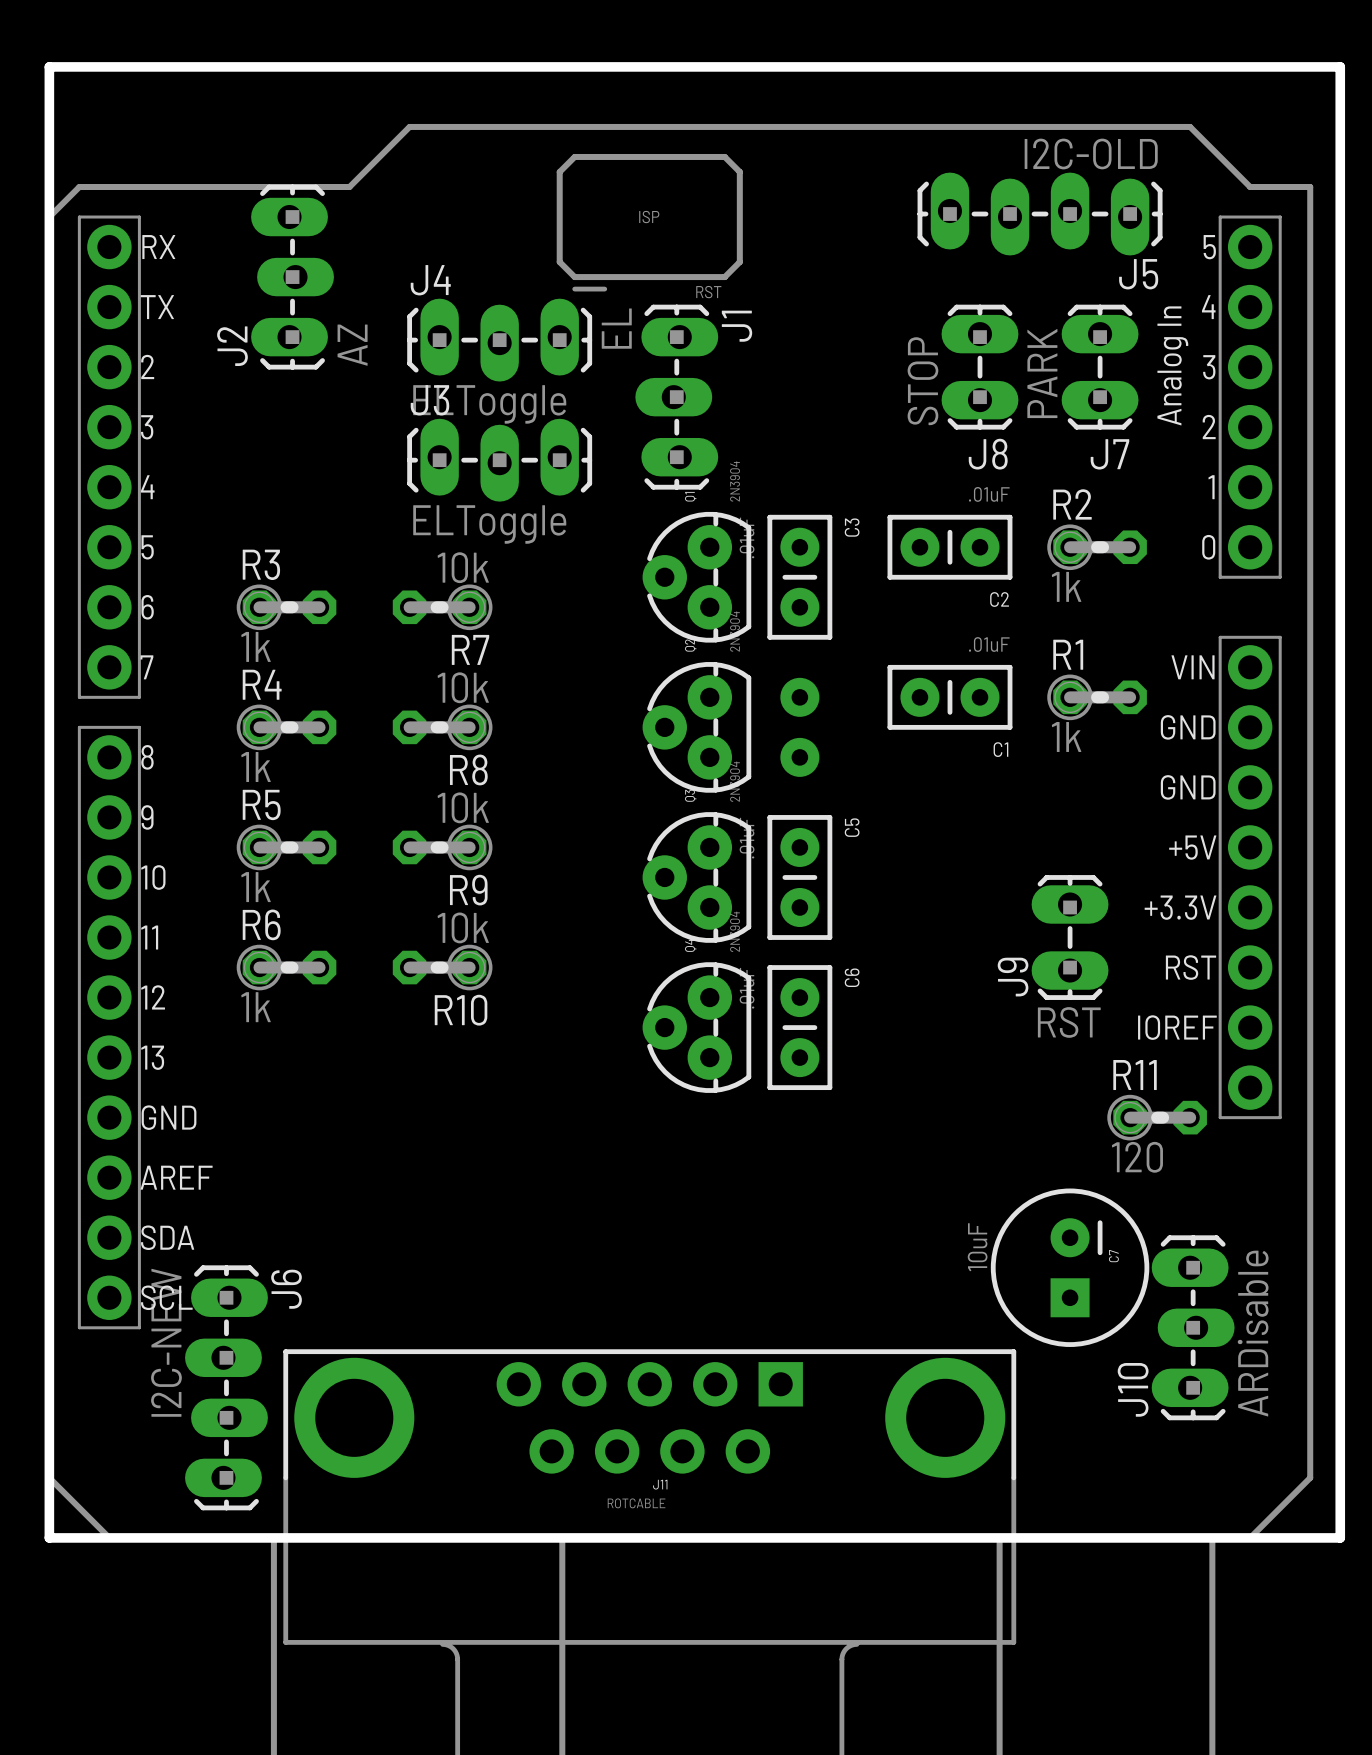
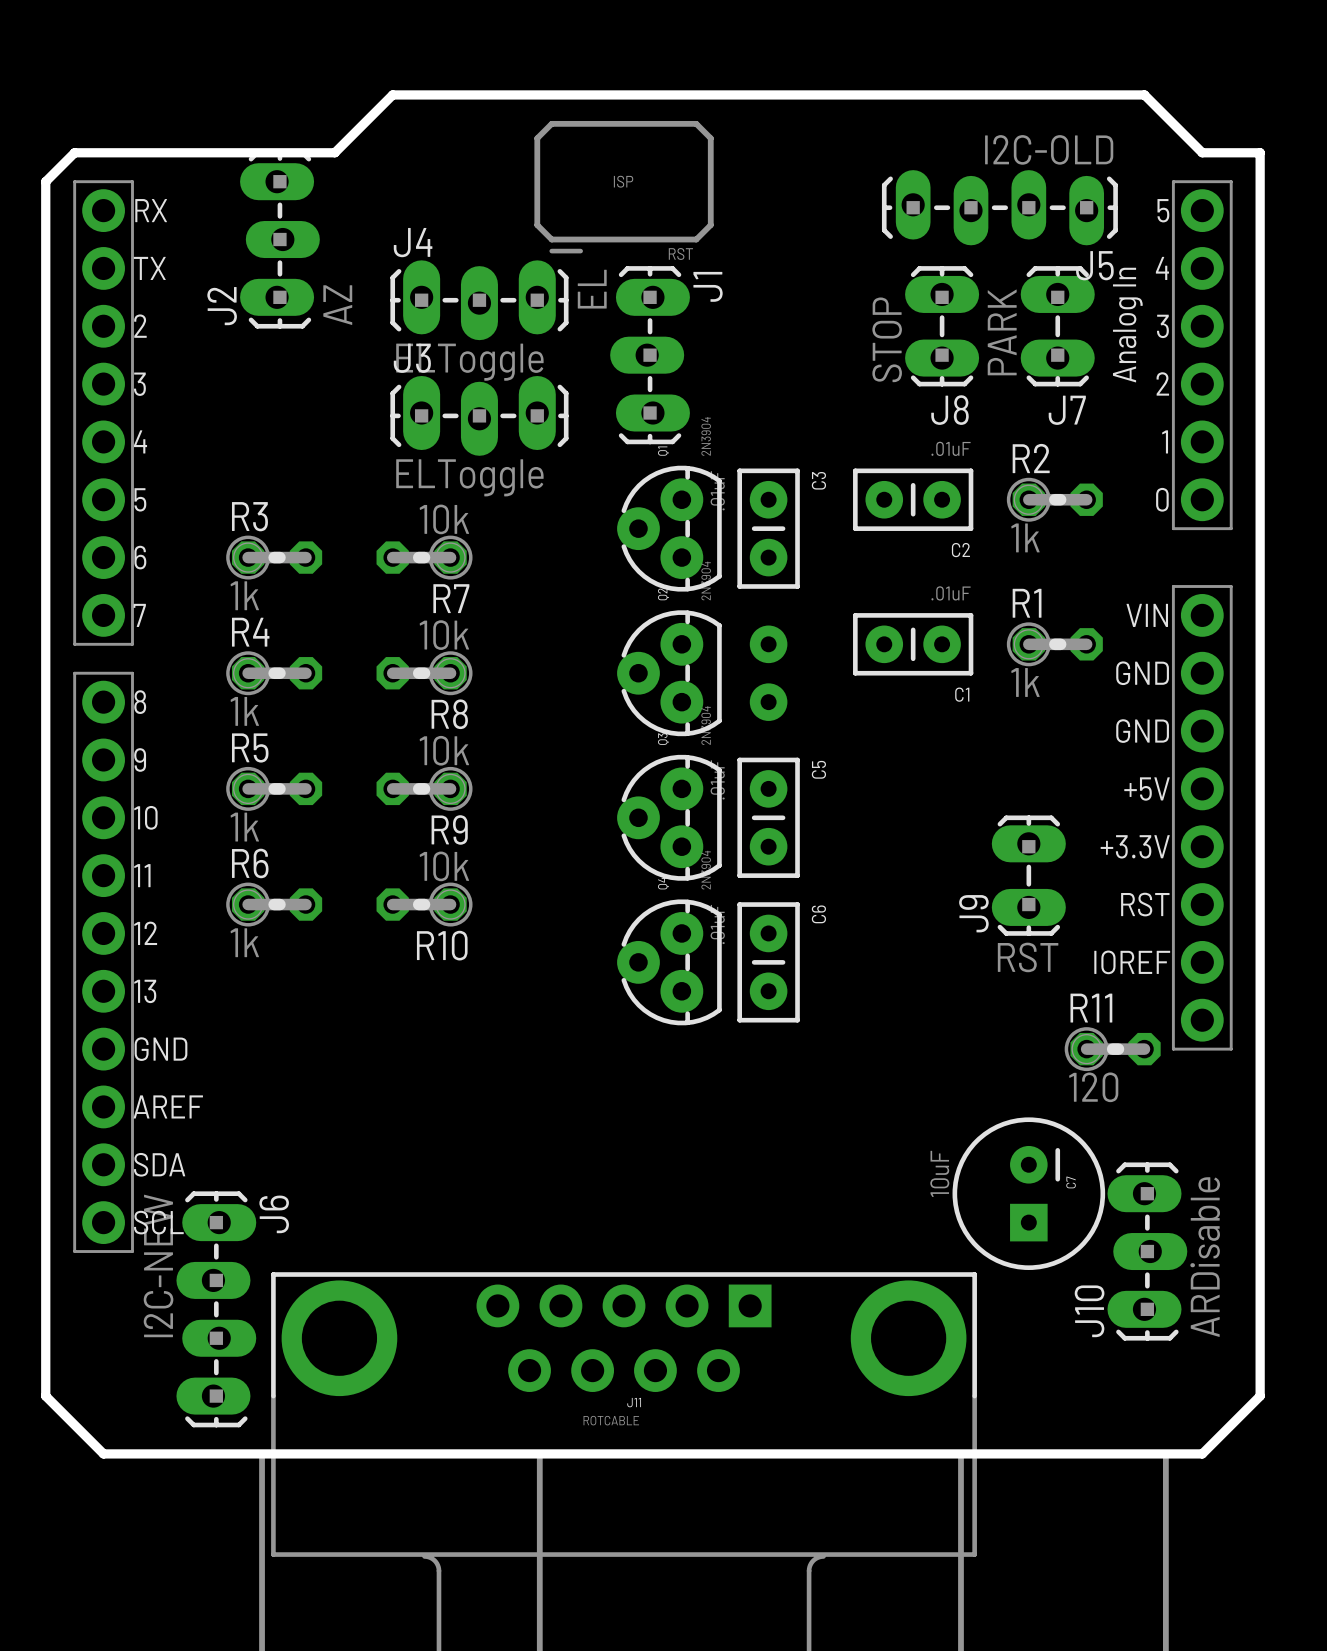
J5 footprint: [917, 172, 1163, 256] -> [881, 170, 1118, 246]
board edge: (49, 217) (49, 66) (1340, 66) (1340, 1537) (1250, 1537) -> (45, 181) (74, 152) (334, 152) (392, 94) (1144, 94) (1202, 152) (1260, 152) (1260, 1396) (1202, 1453)
board edge: (49, 1477) (49, 1537) (109, 1537) -> (45, 1396) (103, 1453)

